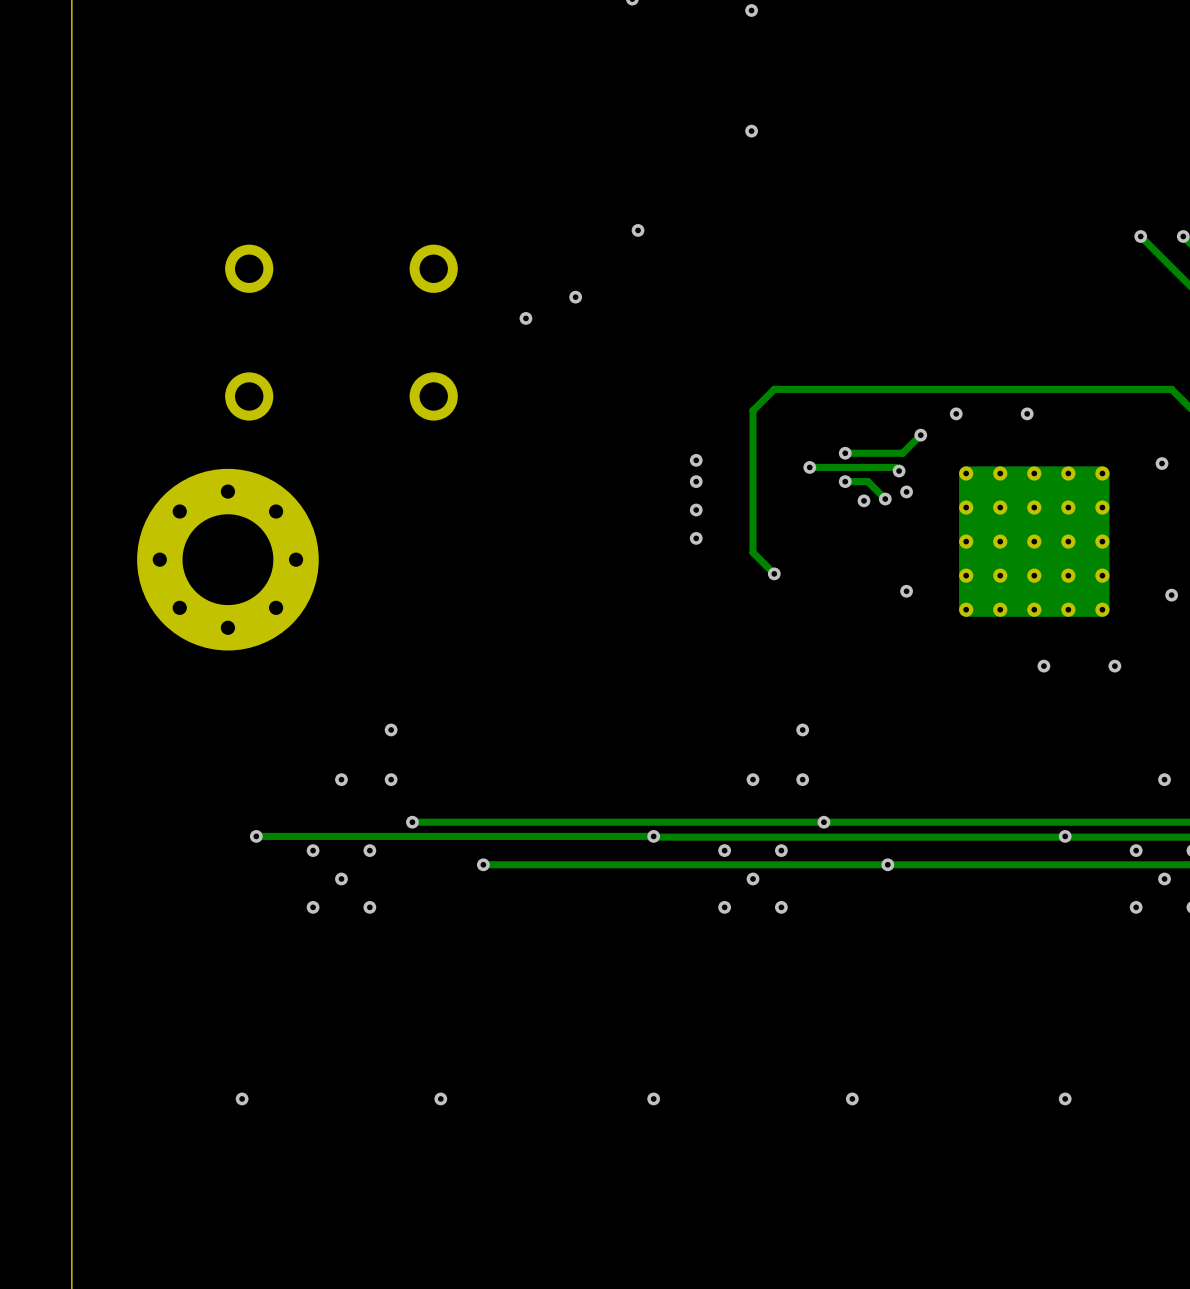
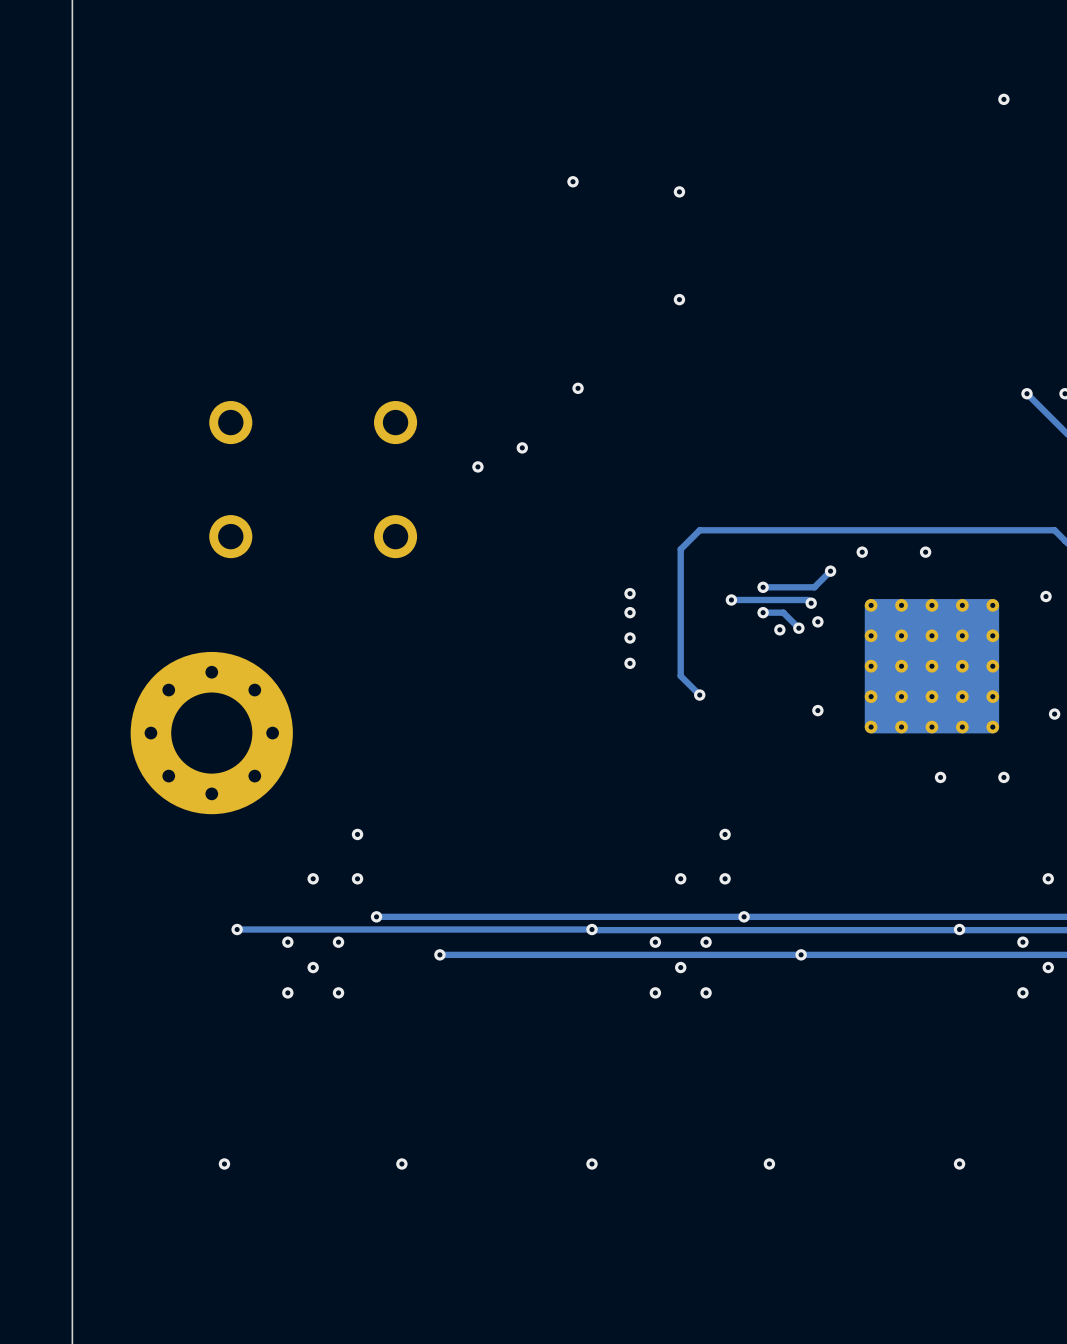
part position: (227, 559) -> (211, 733)

